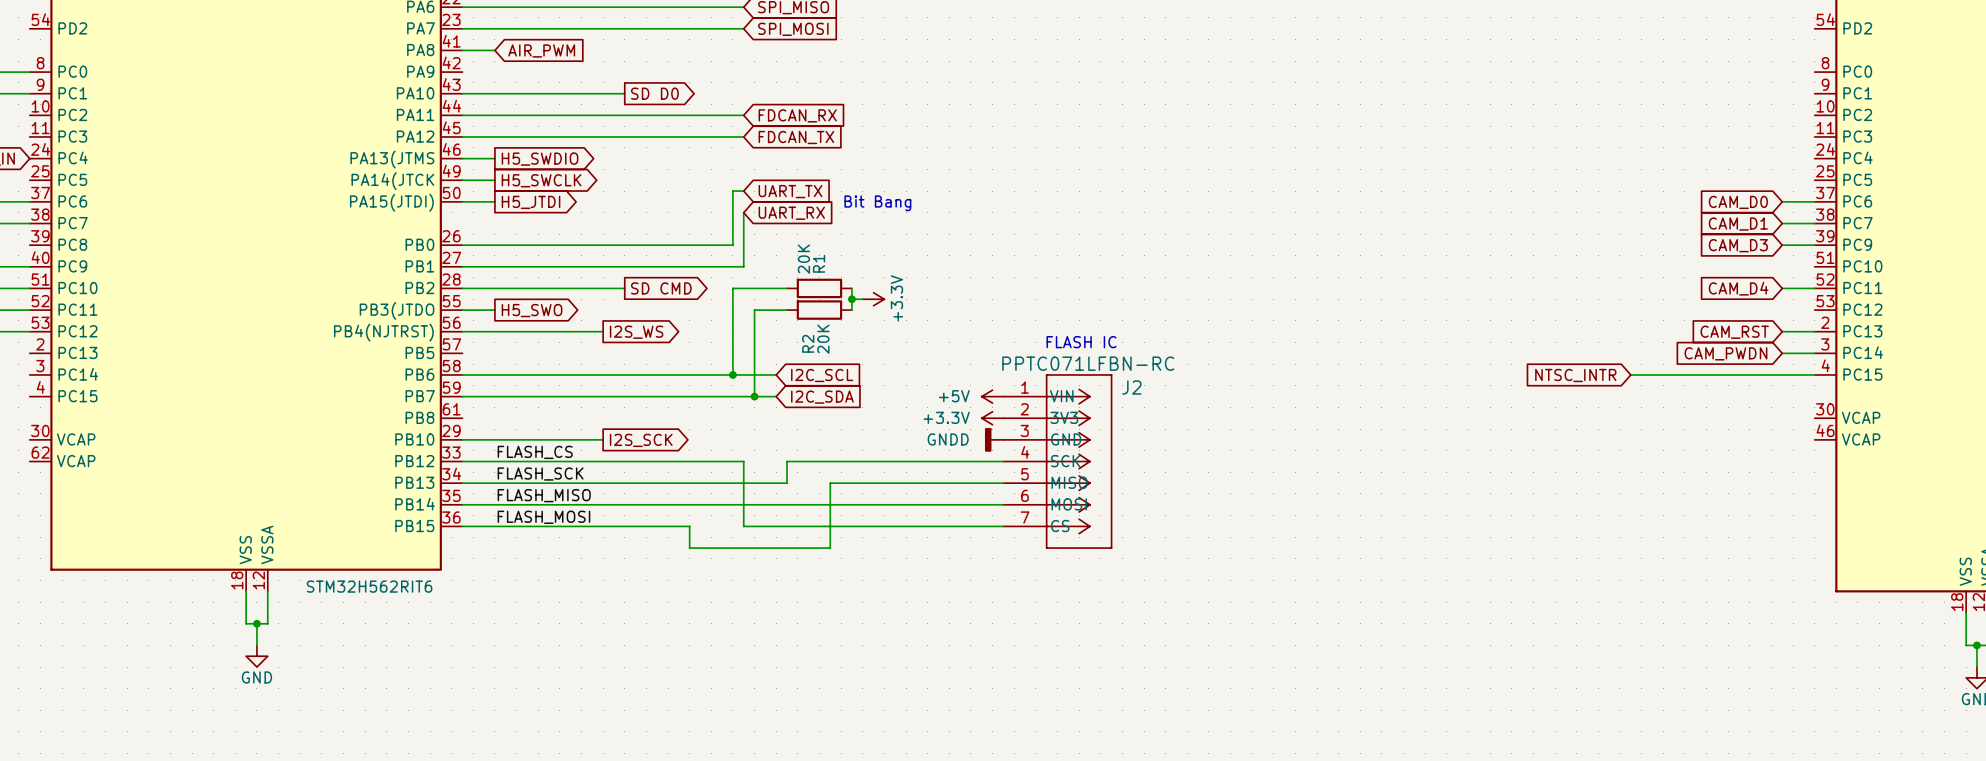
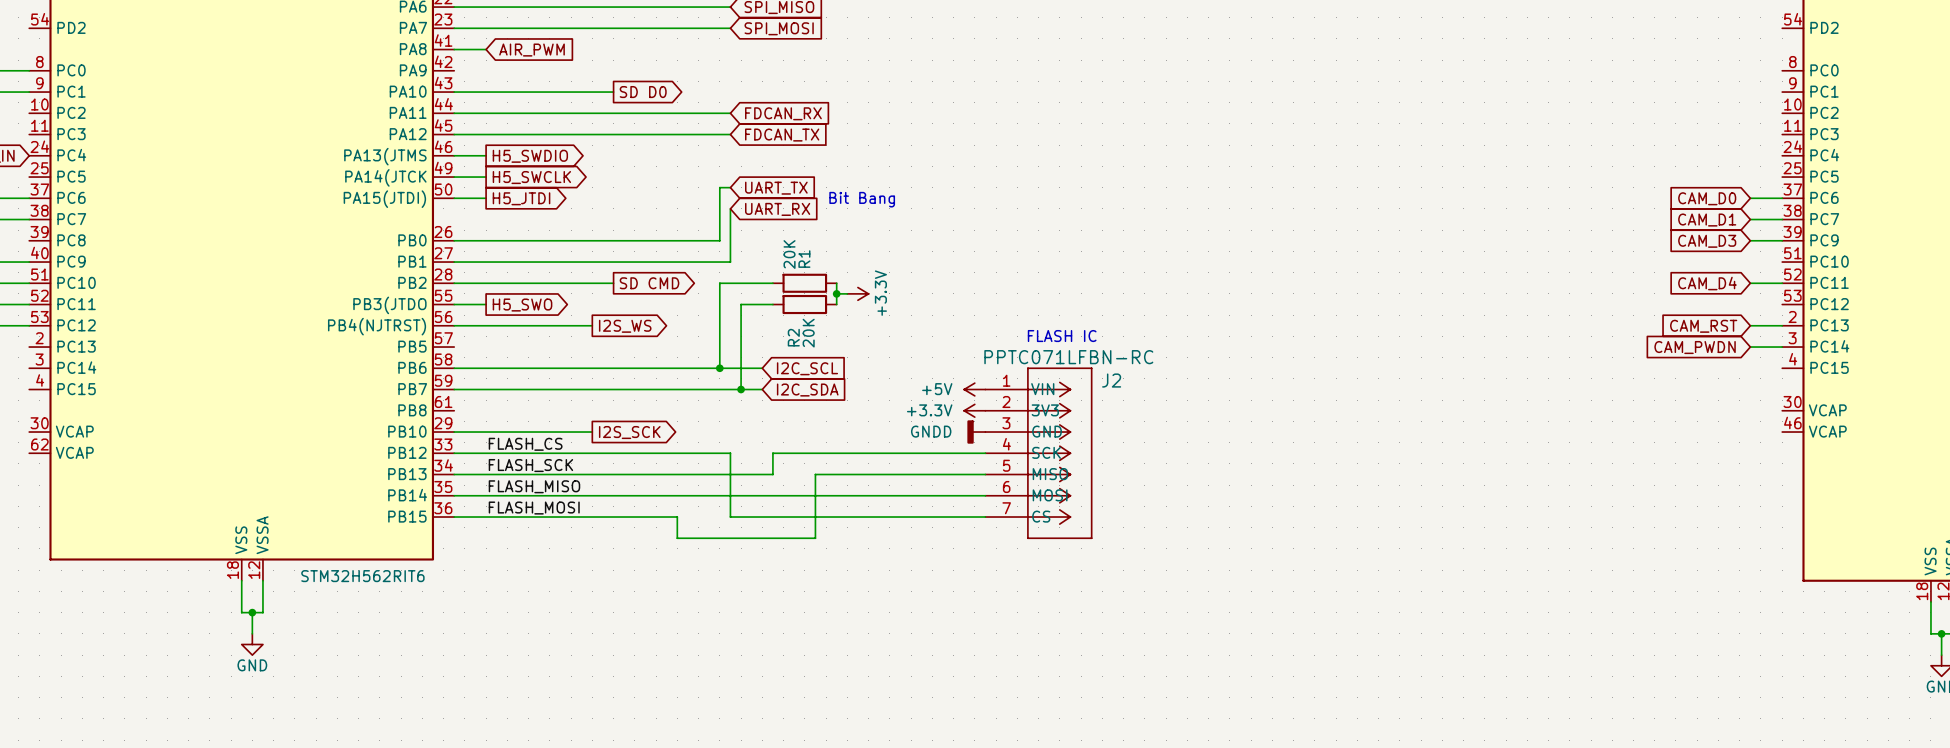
wire: (1630, 374) (1814, 374) -> none
global label: NTSC_INTR (1575, 375) -> none

